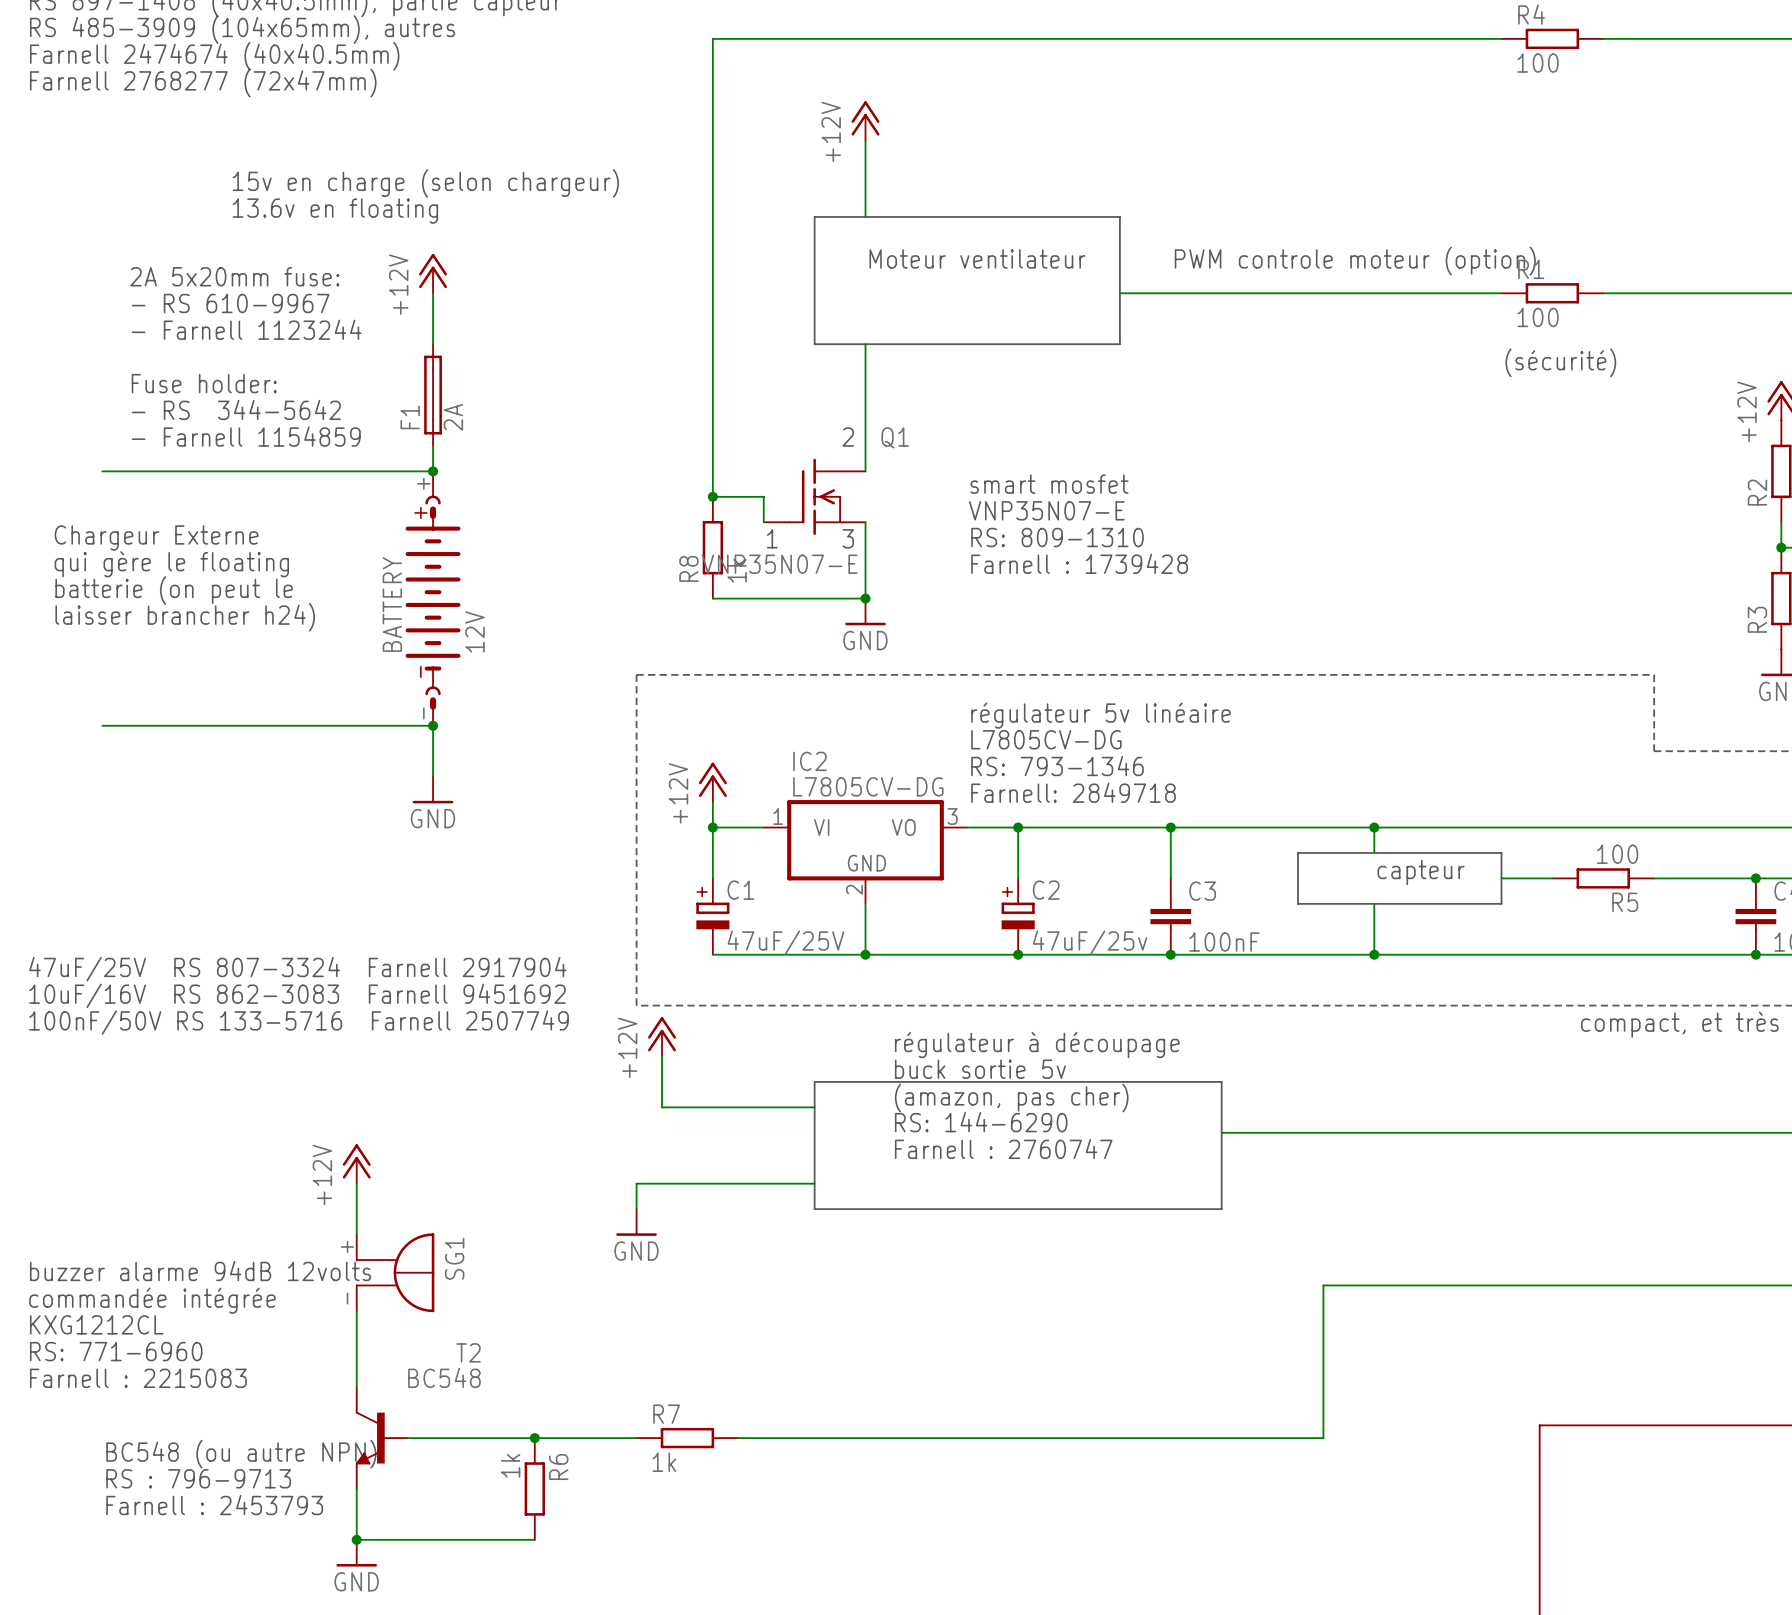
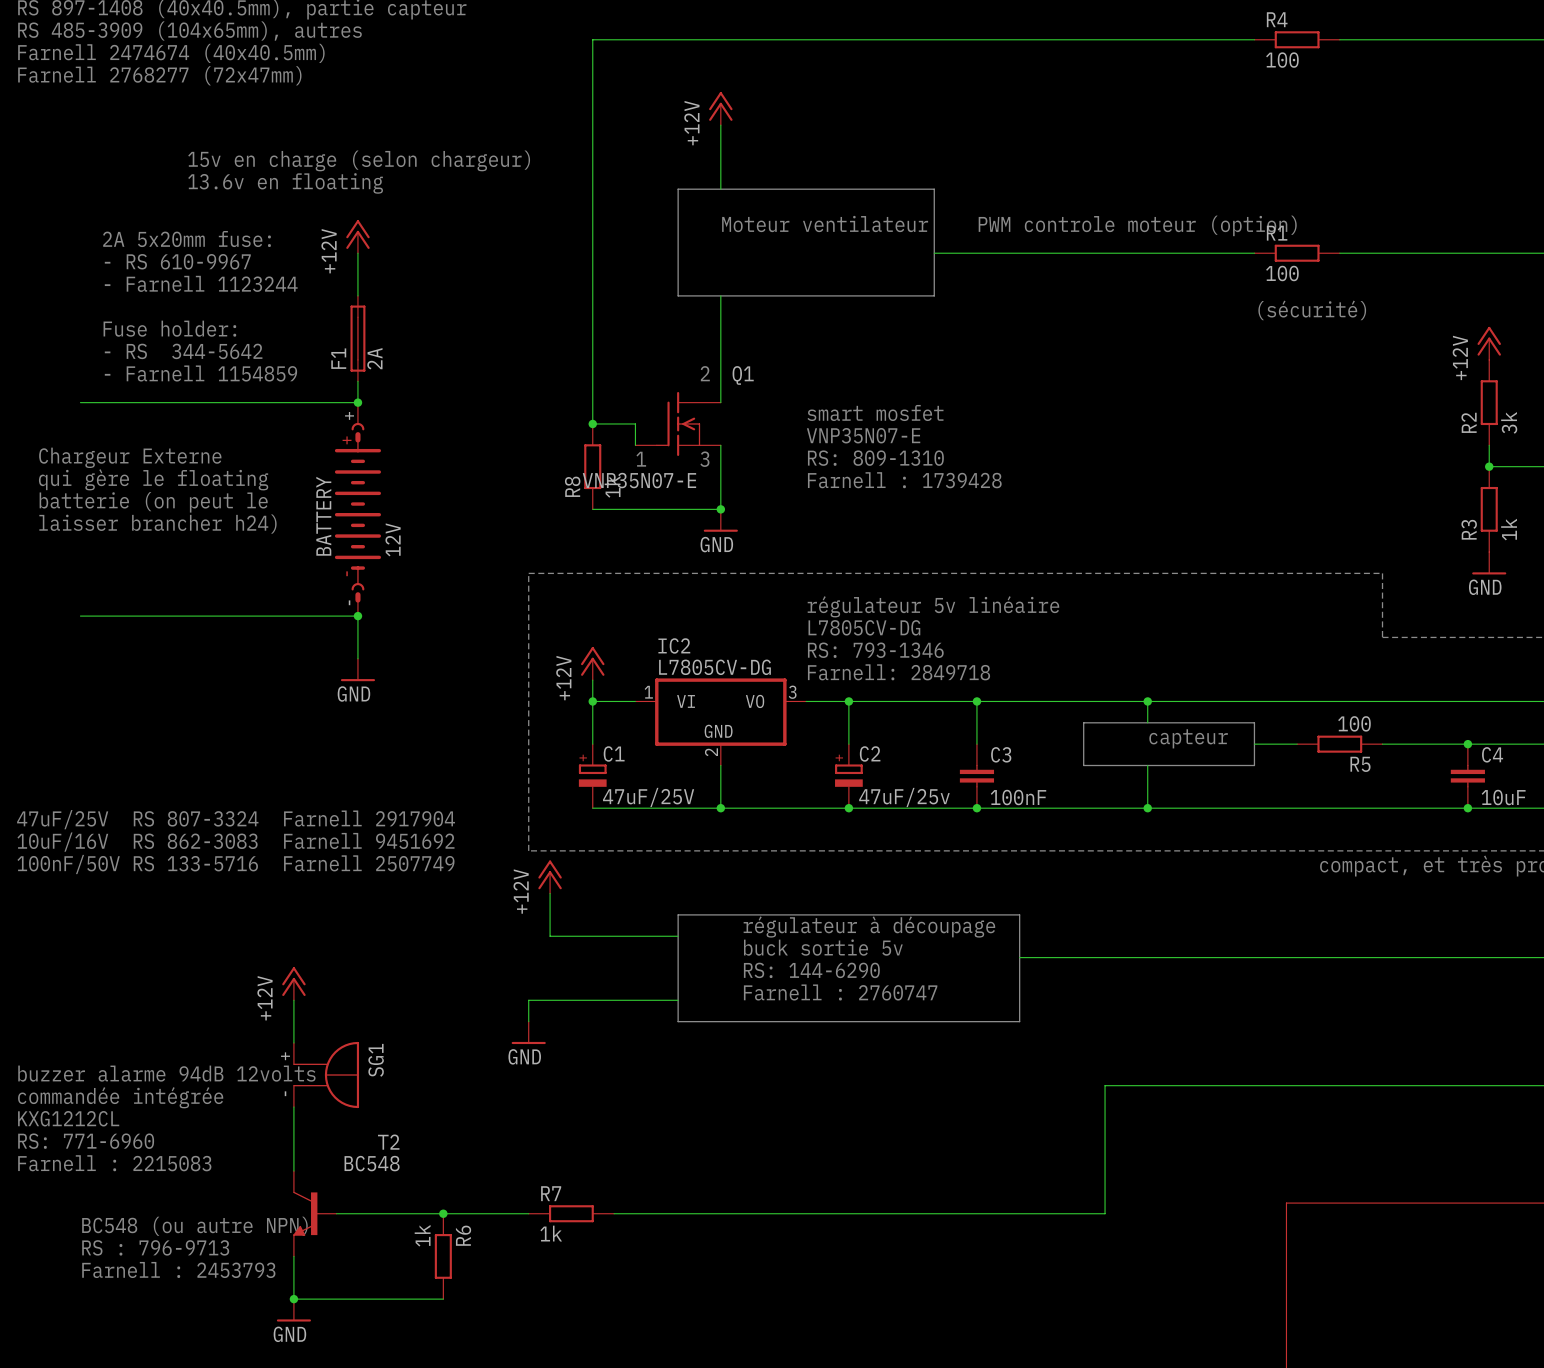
text: régulateur à découpage (1037, 1045) -> none
text: buck sortie 5v (980, 1069) -> none
text: (amazon, pas cher) (1011, 1098) -> régulateur à découpage (869, 926)
text: RS: 144-6290 (981, 1122) -> buck sortie 5v (823, 947)
text: Farnell : 2760747 (1003, 1148) -> RS: 144-6290 (811, 970)
text: none -> Farnell : 2760747 (840, 992)

